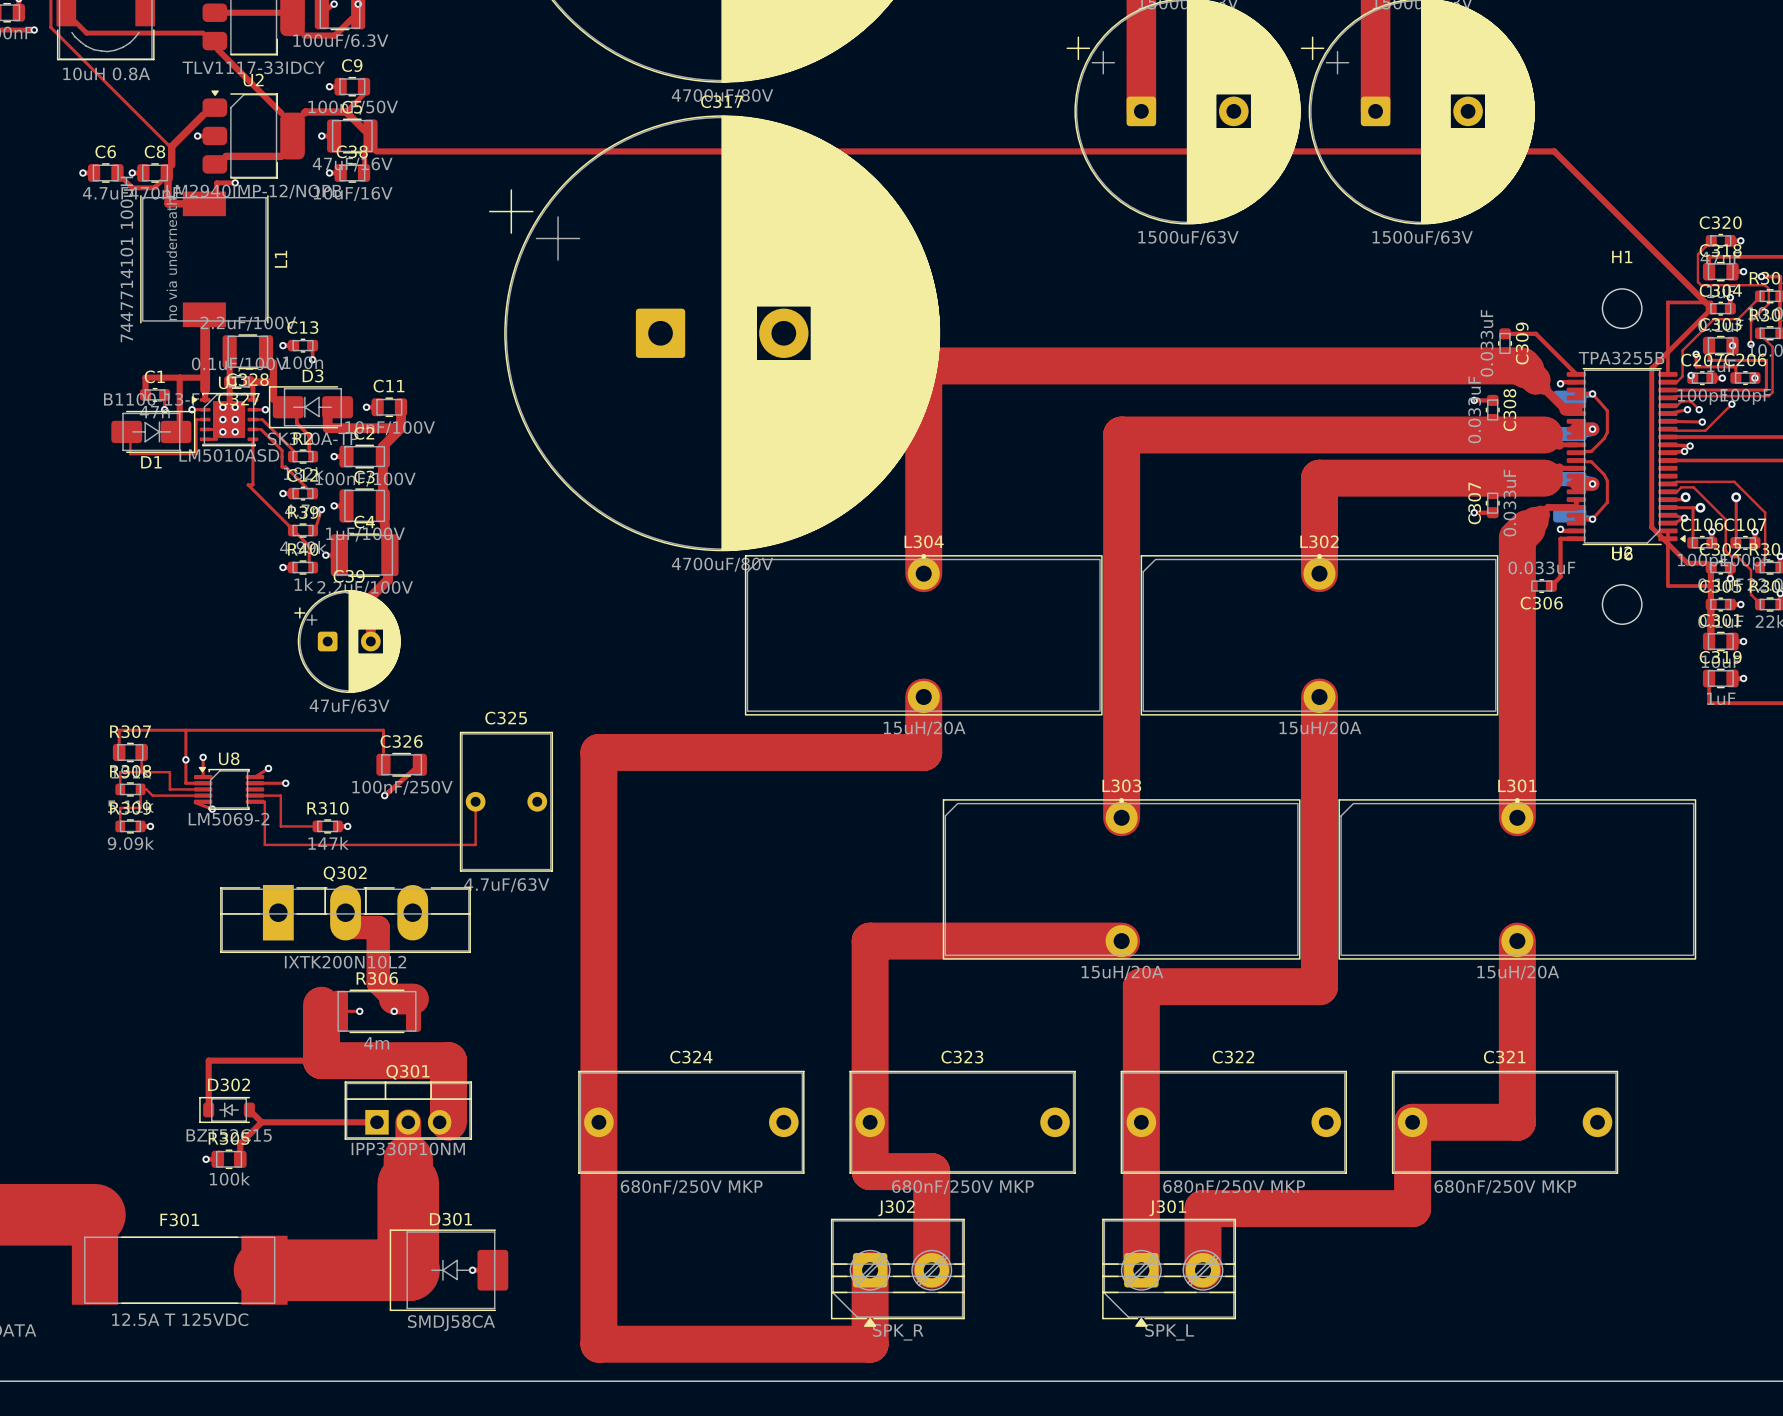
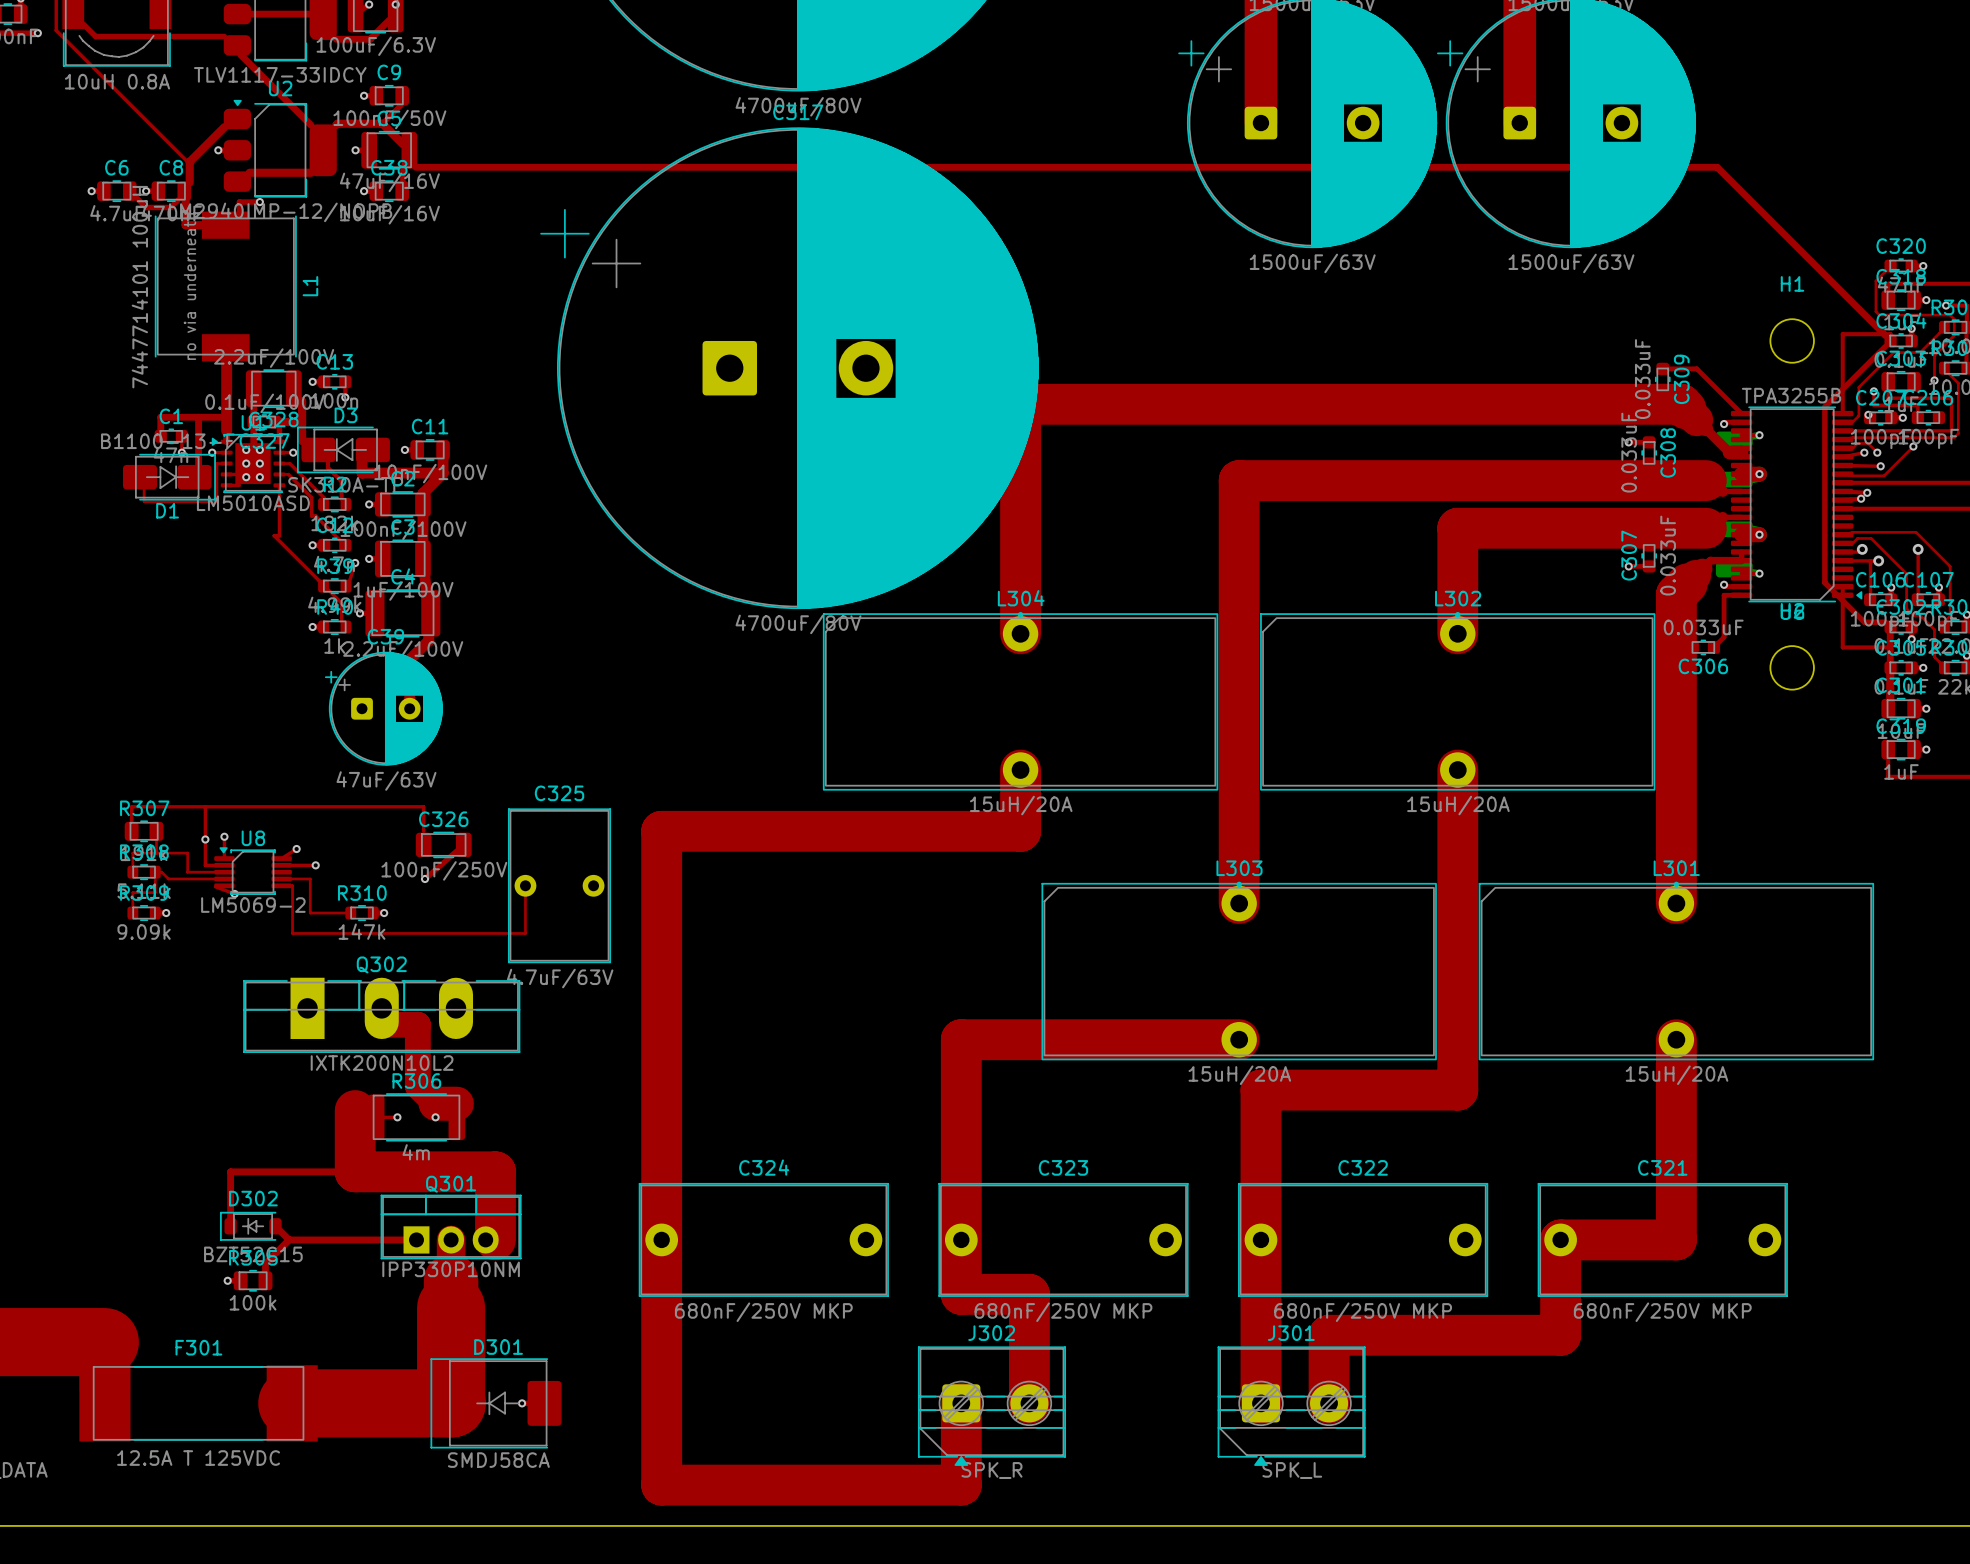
via: (1732, 345) -> none
via: (1755, 378) -> none
top track: (1592, 393) (1607, 410) (1607, 432) (1604, 438) (1591, 451) (1584, 451) -> none
top track: (1584, 461) (1591, 461) (1604, 474) (1607, 480) (1607, 502) (1592, 519) -> none
top track: (1673, 515) (1684, 518) (1673, 523) -> none
via: (1684, 518) -> none

